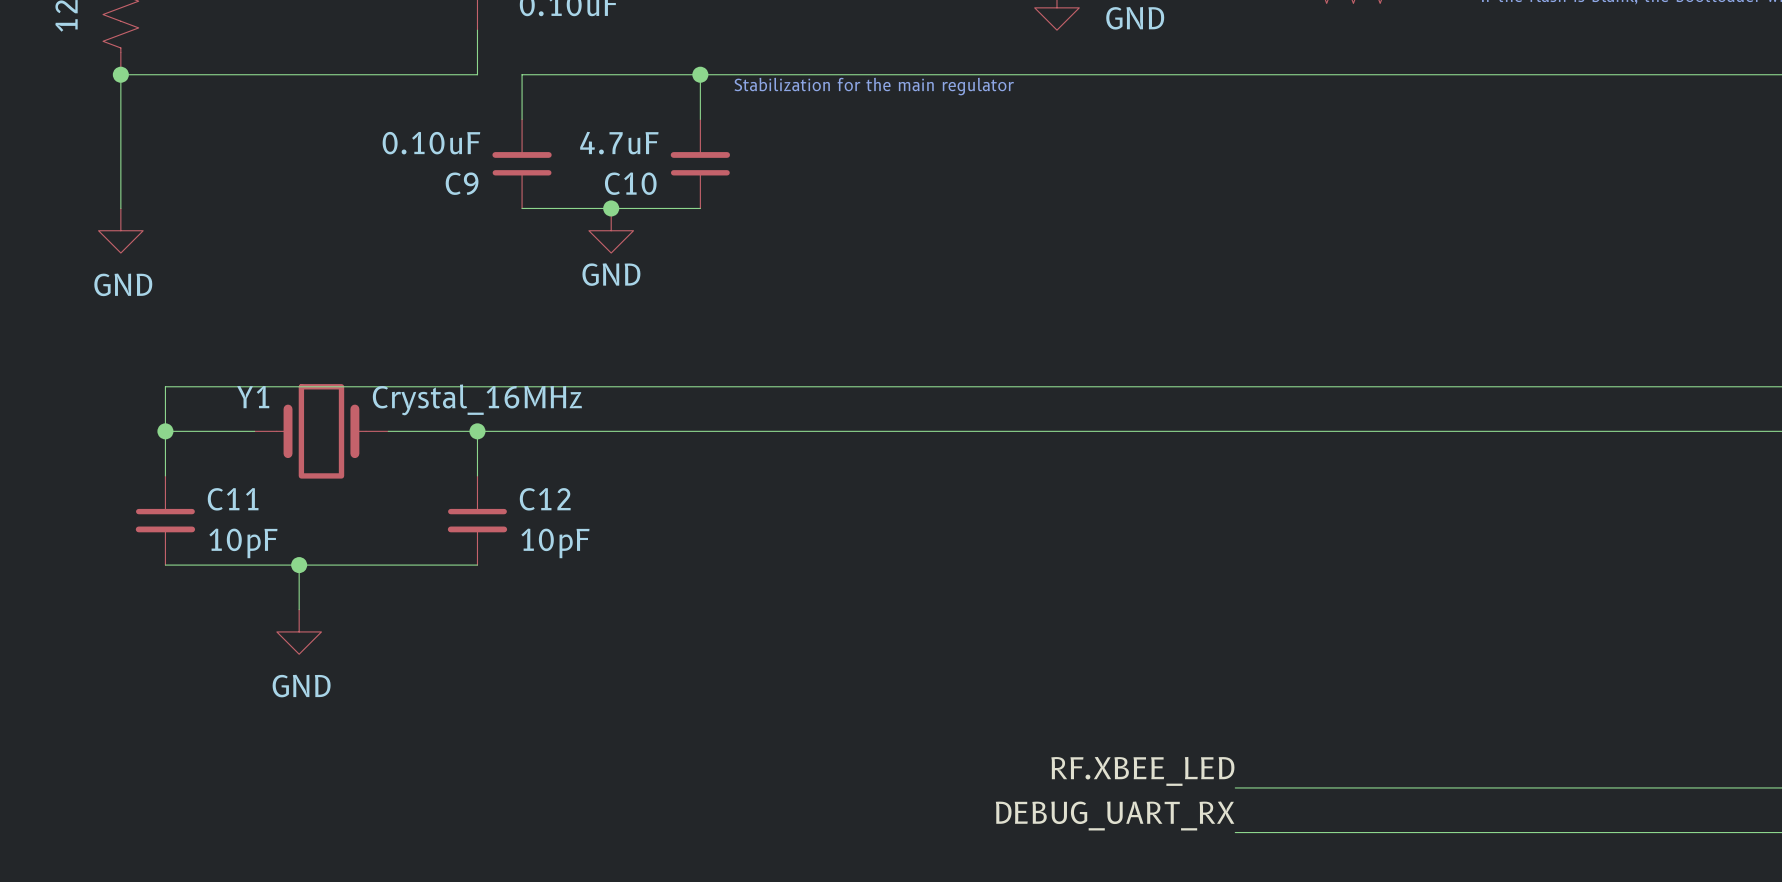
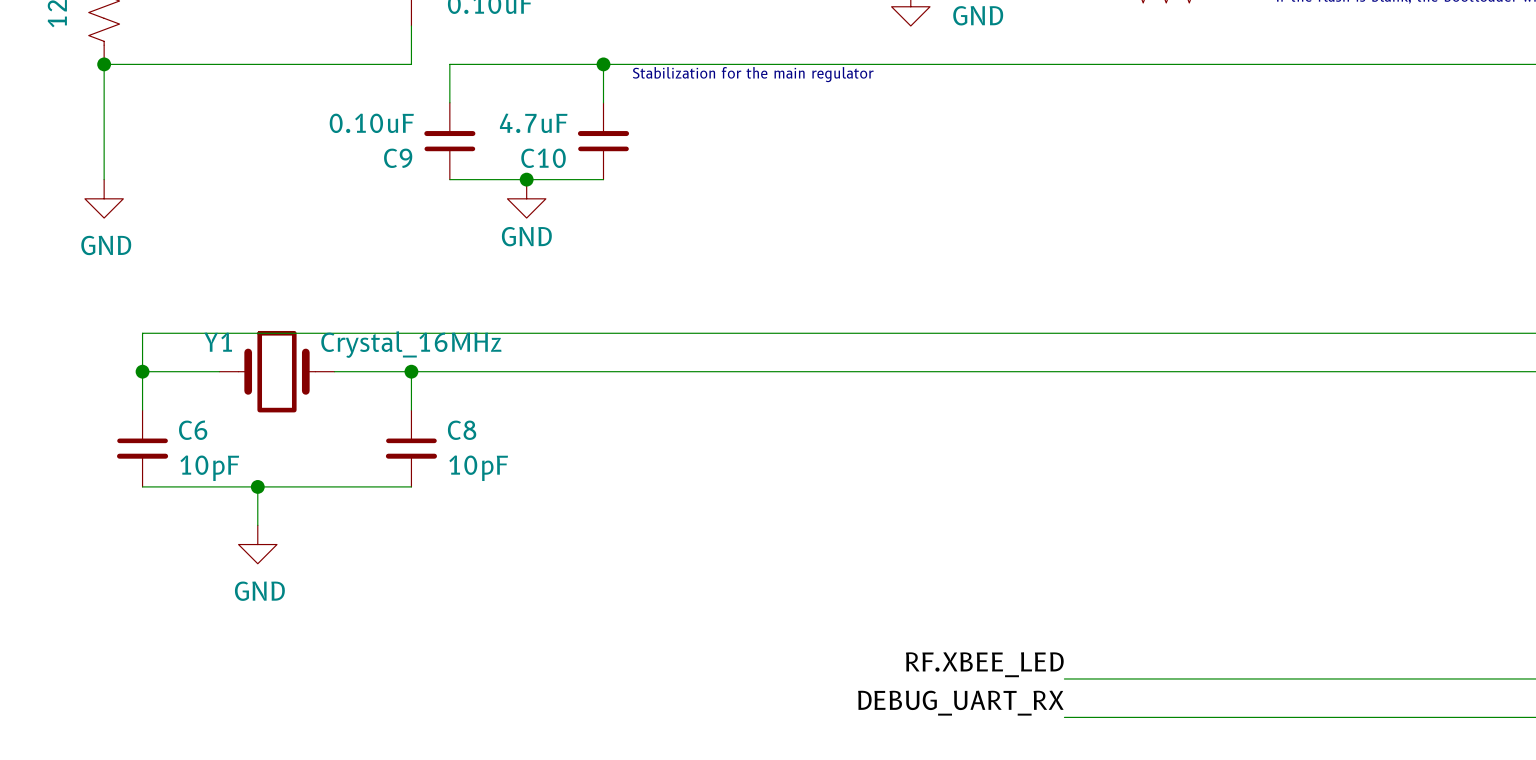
C11 name: C11 (233, 499) -> C6 (193, 430)
C12 name: C12 (545, 499) -> C8 (462, 430)

